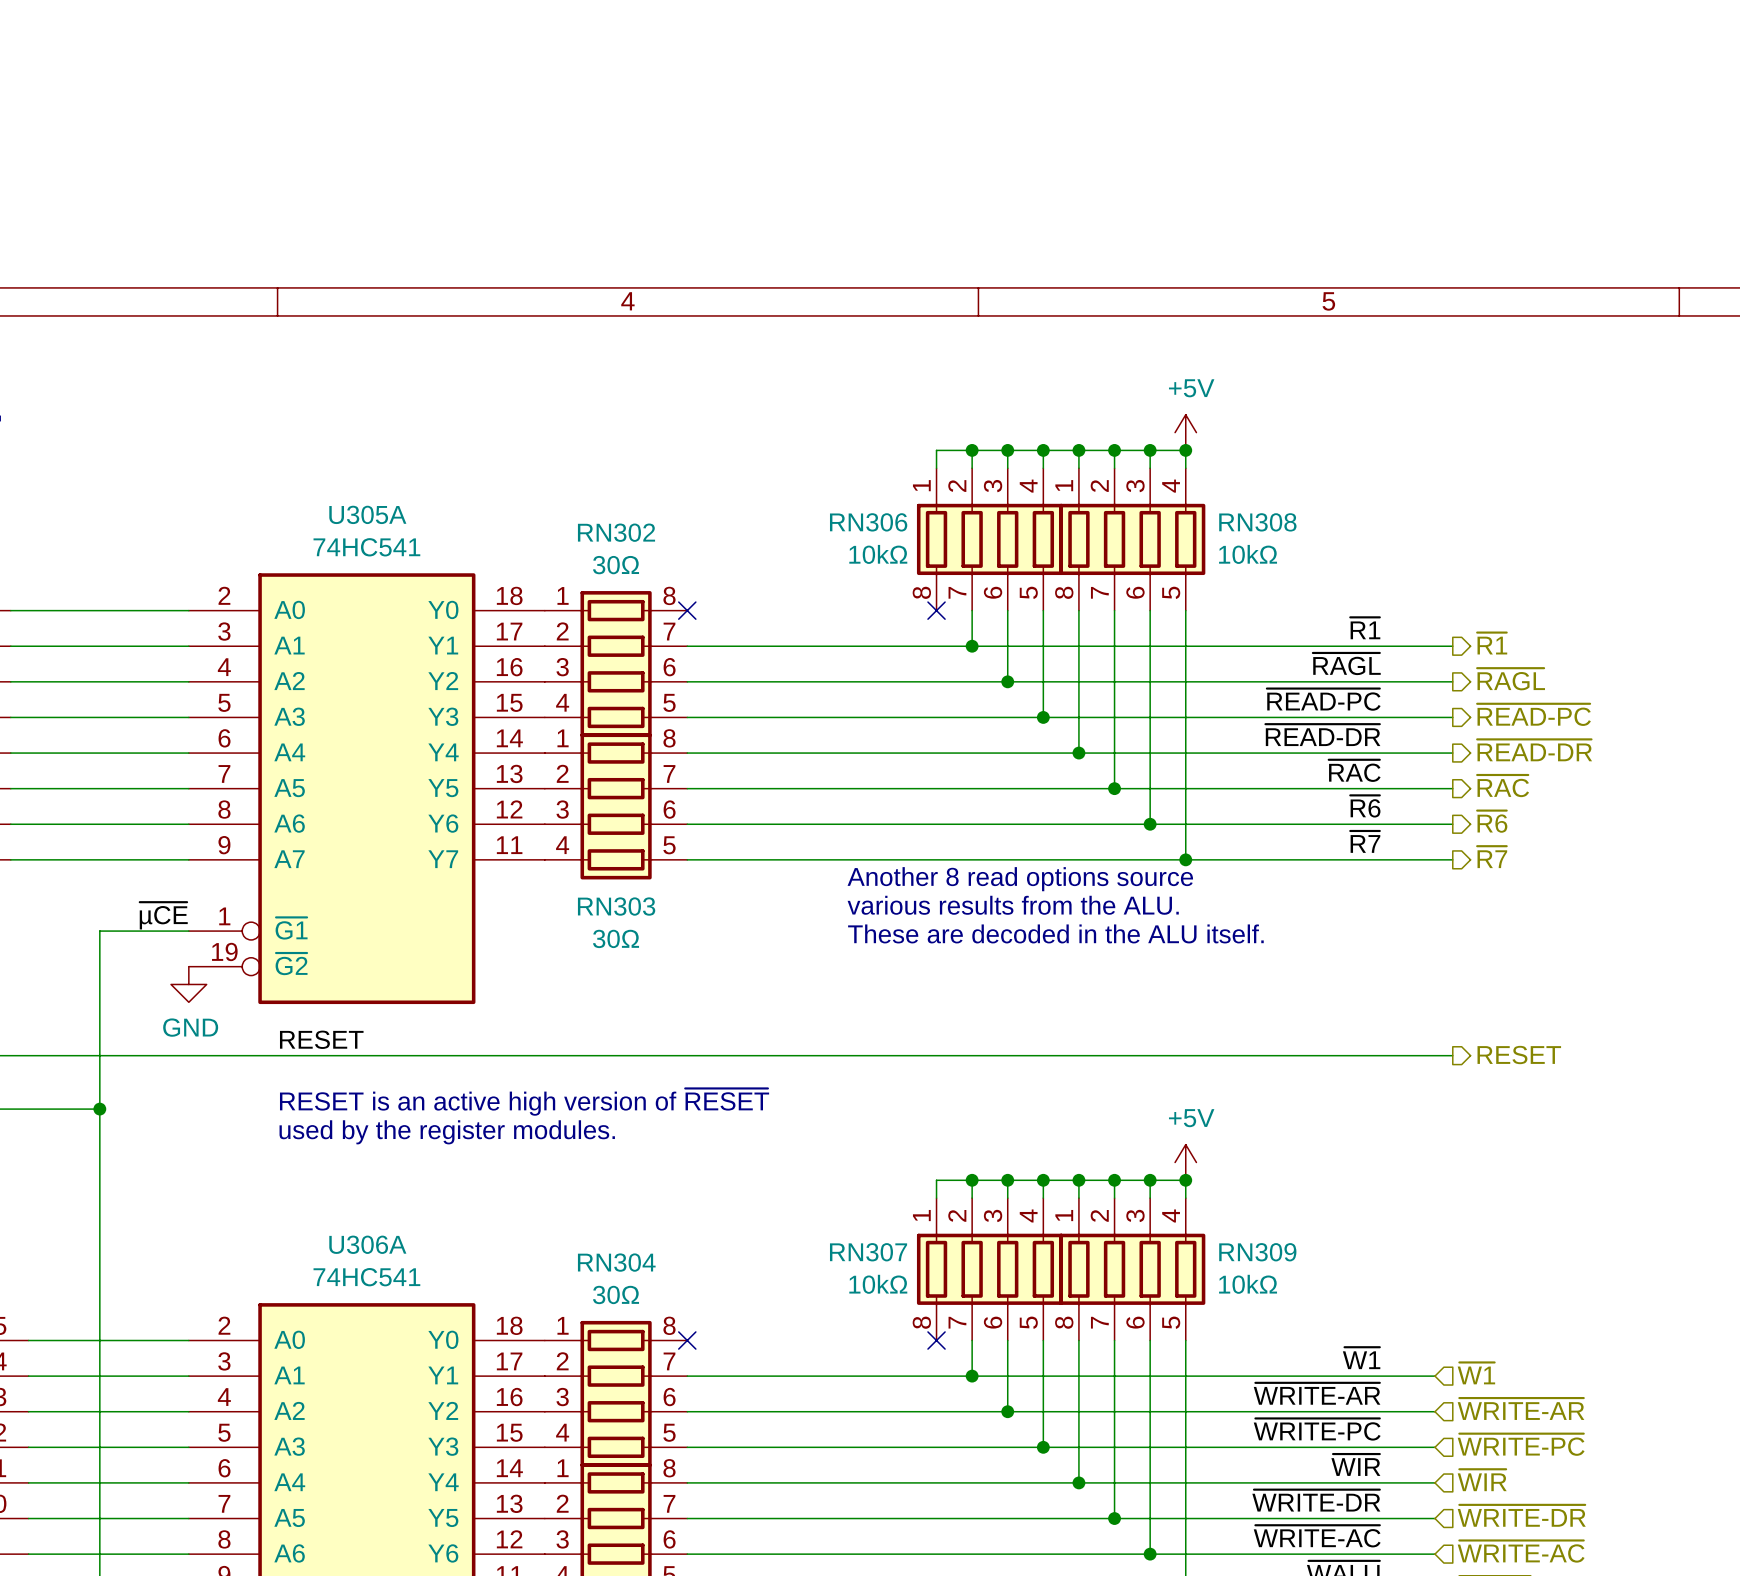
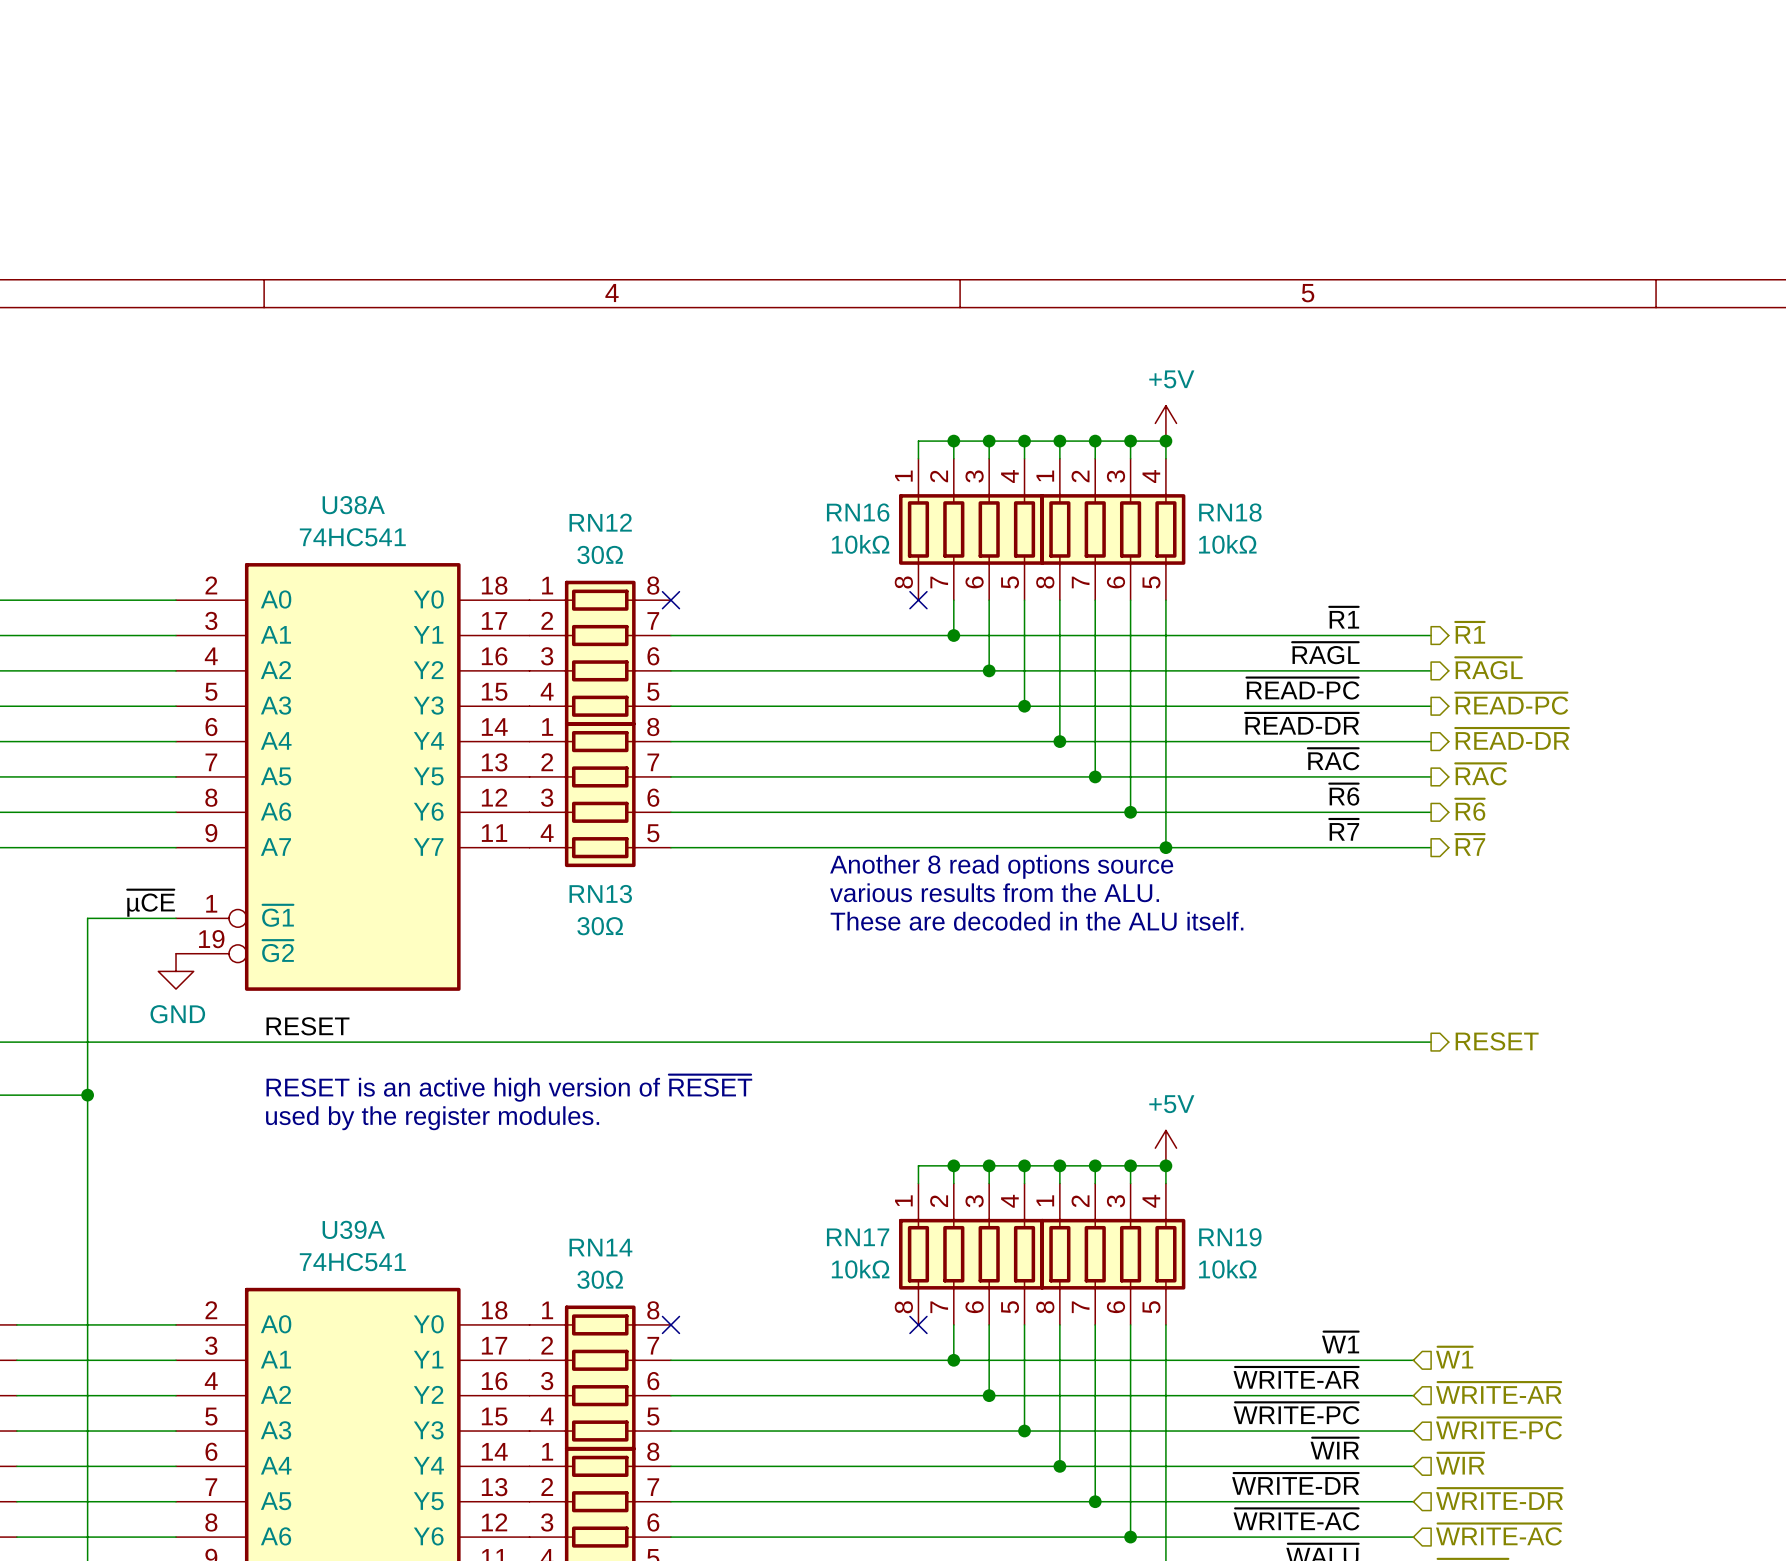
U305A name: U305A (367, 514) -> U38A (353, 505)
RN306 name: RN306 (868, 522) -> RN16 (858, 512)
RN308 name: RN308 (1257, 522) -> RN18 (1230, 512)
RN302 name: RN302 (616, 532) -> RN12 (600, 522)
RN303 name: RN303 (616, 906) -> RN13 (600, 894)
U306A name: U306A (367, 1244) -> U39A (353, 1229)
RN307 name: RN307 (868, 1252) -> RN17 (858, 1237)
RN309 name: RN309 (1257, 1252) -> RN19 (1230, 1237)
RN304 name: RN304 (616, 1262) -> RN14 (600, 1247)

